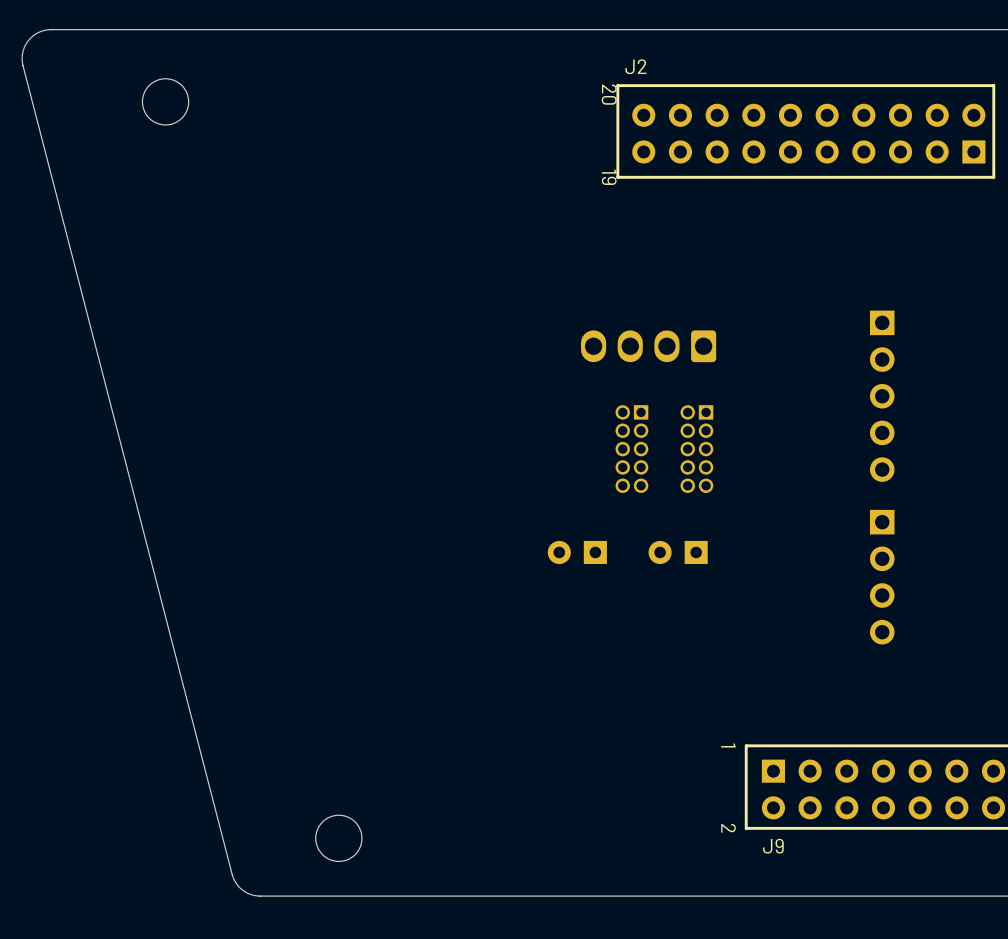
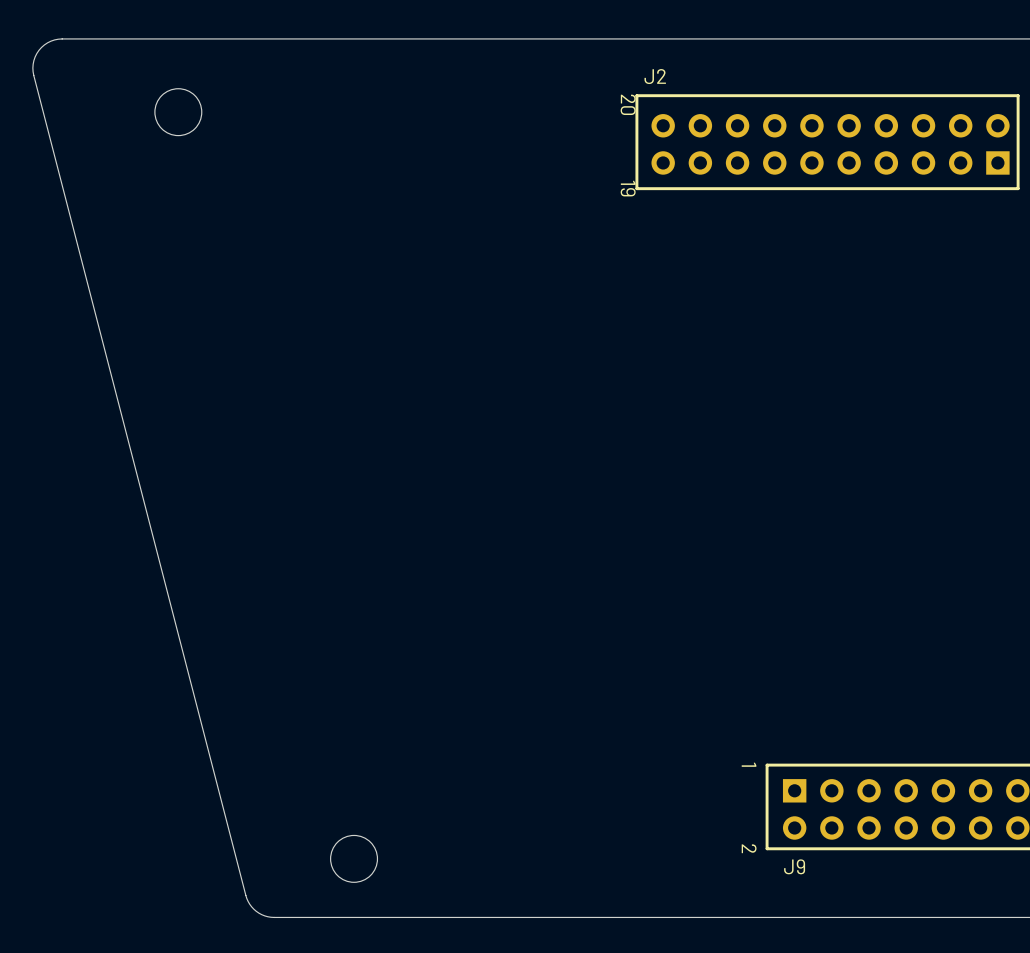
part: (648, 346) -> none
part: (882, 396) -> none
part: (631, 449) -> none
part: (696, 449) -> none
part: (577, 552) -> none
part: (678, 552) -> none
part: (882, 577) -> none

